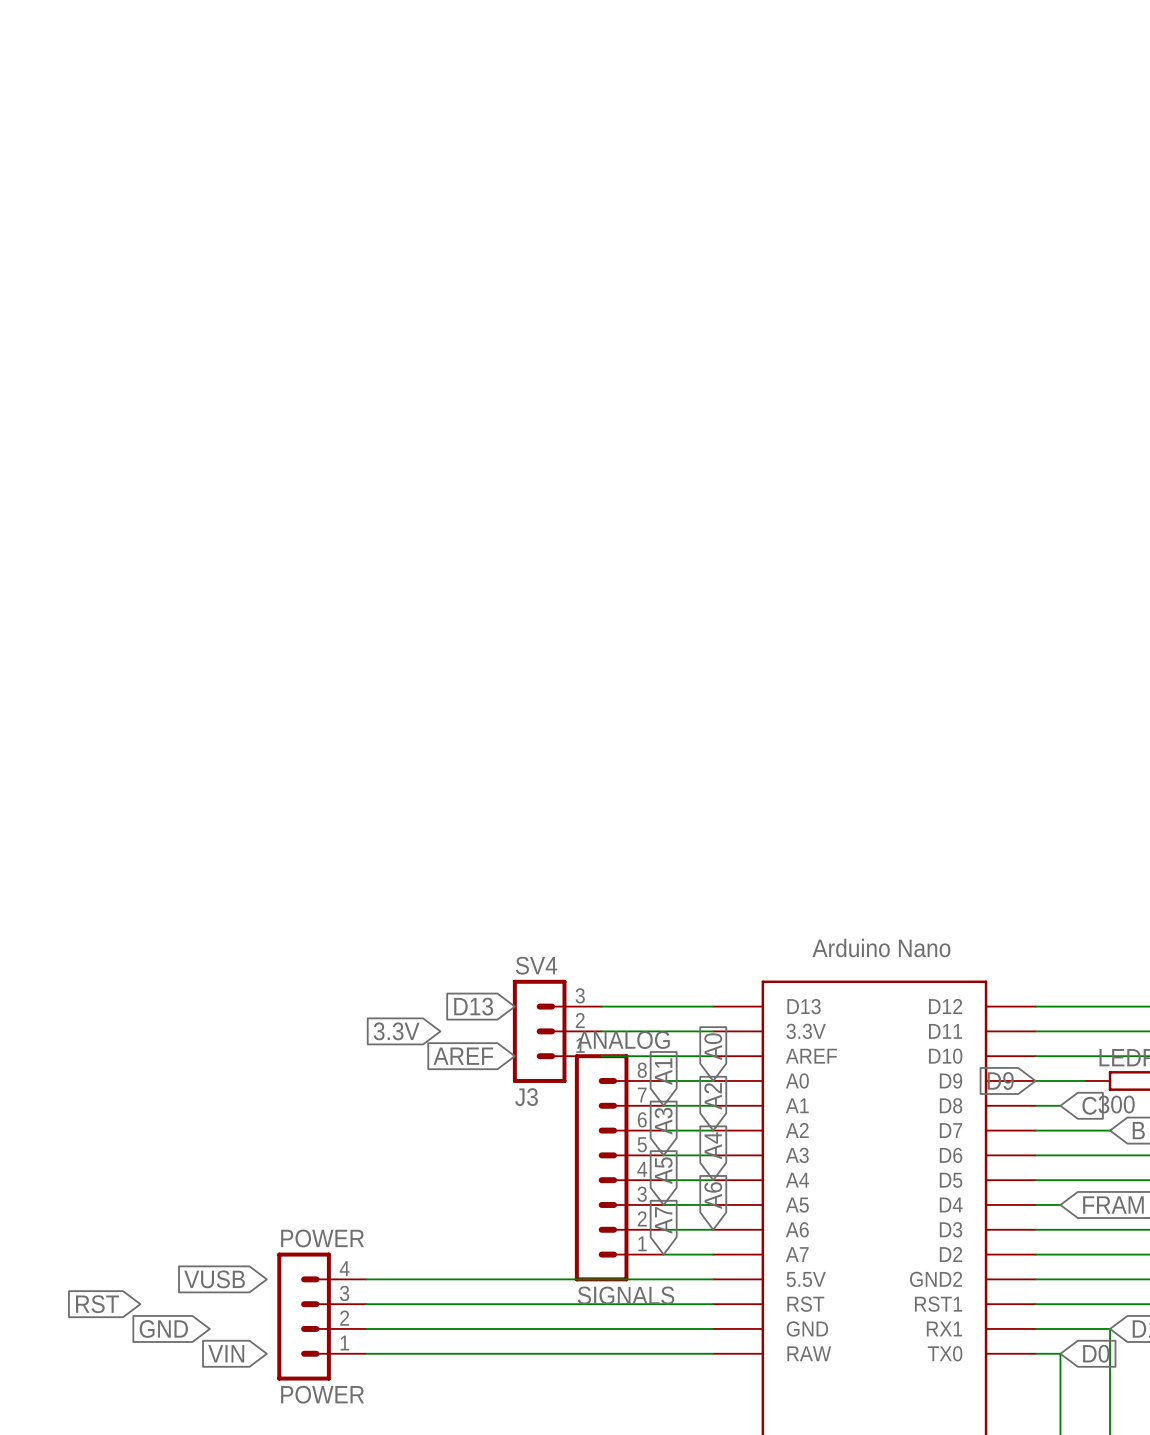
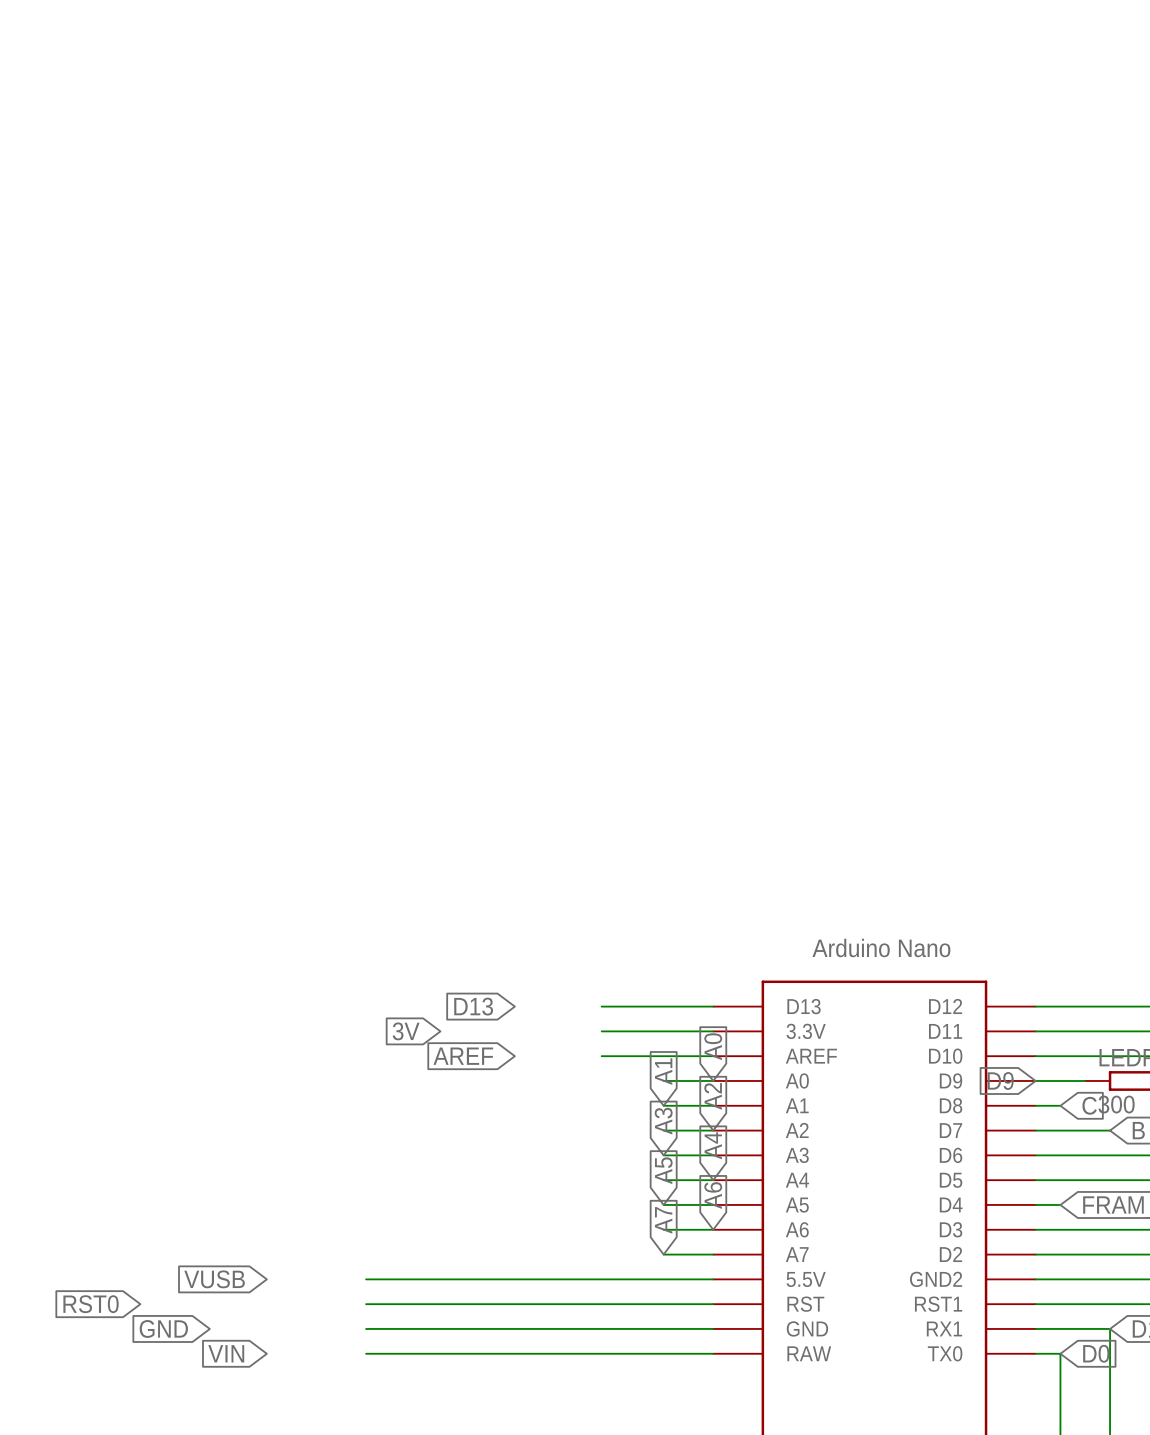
global label: 3.3V (396, 1031) -> 3V (406, 1031)
SV4: J3 (557, 1031) -> none
ANALOG: SIGNALS (619, 1167) -> none
global label: RST (97, 1304) -> RST0 (91, 1304)
POWER: POWER (321, 1316) -> none

